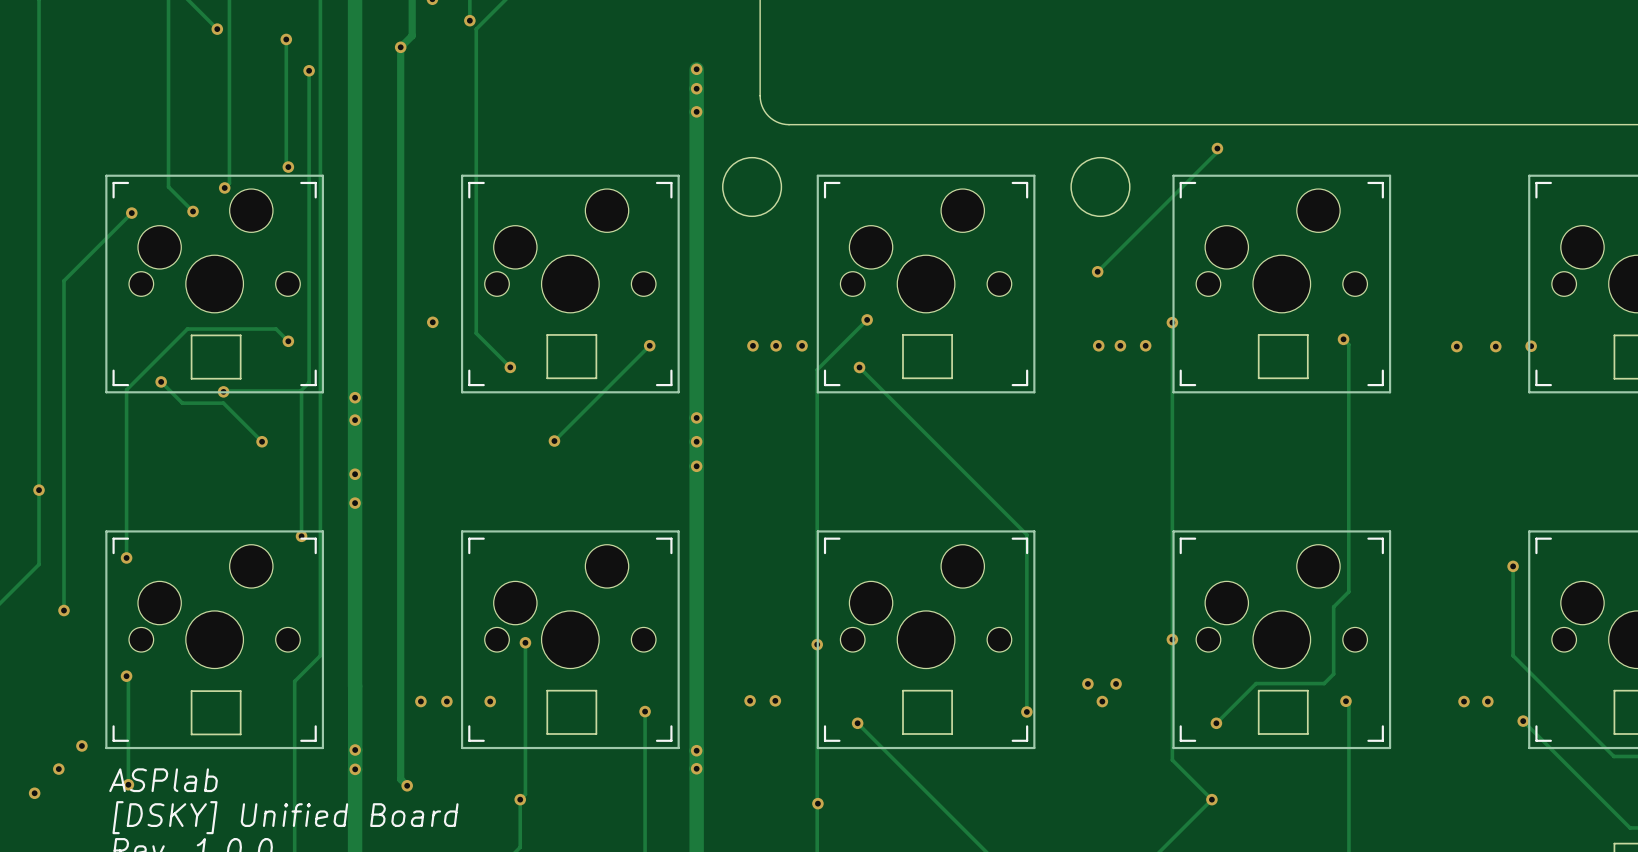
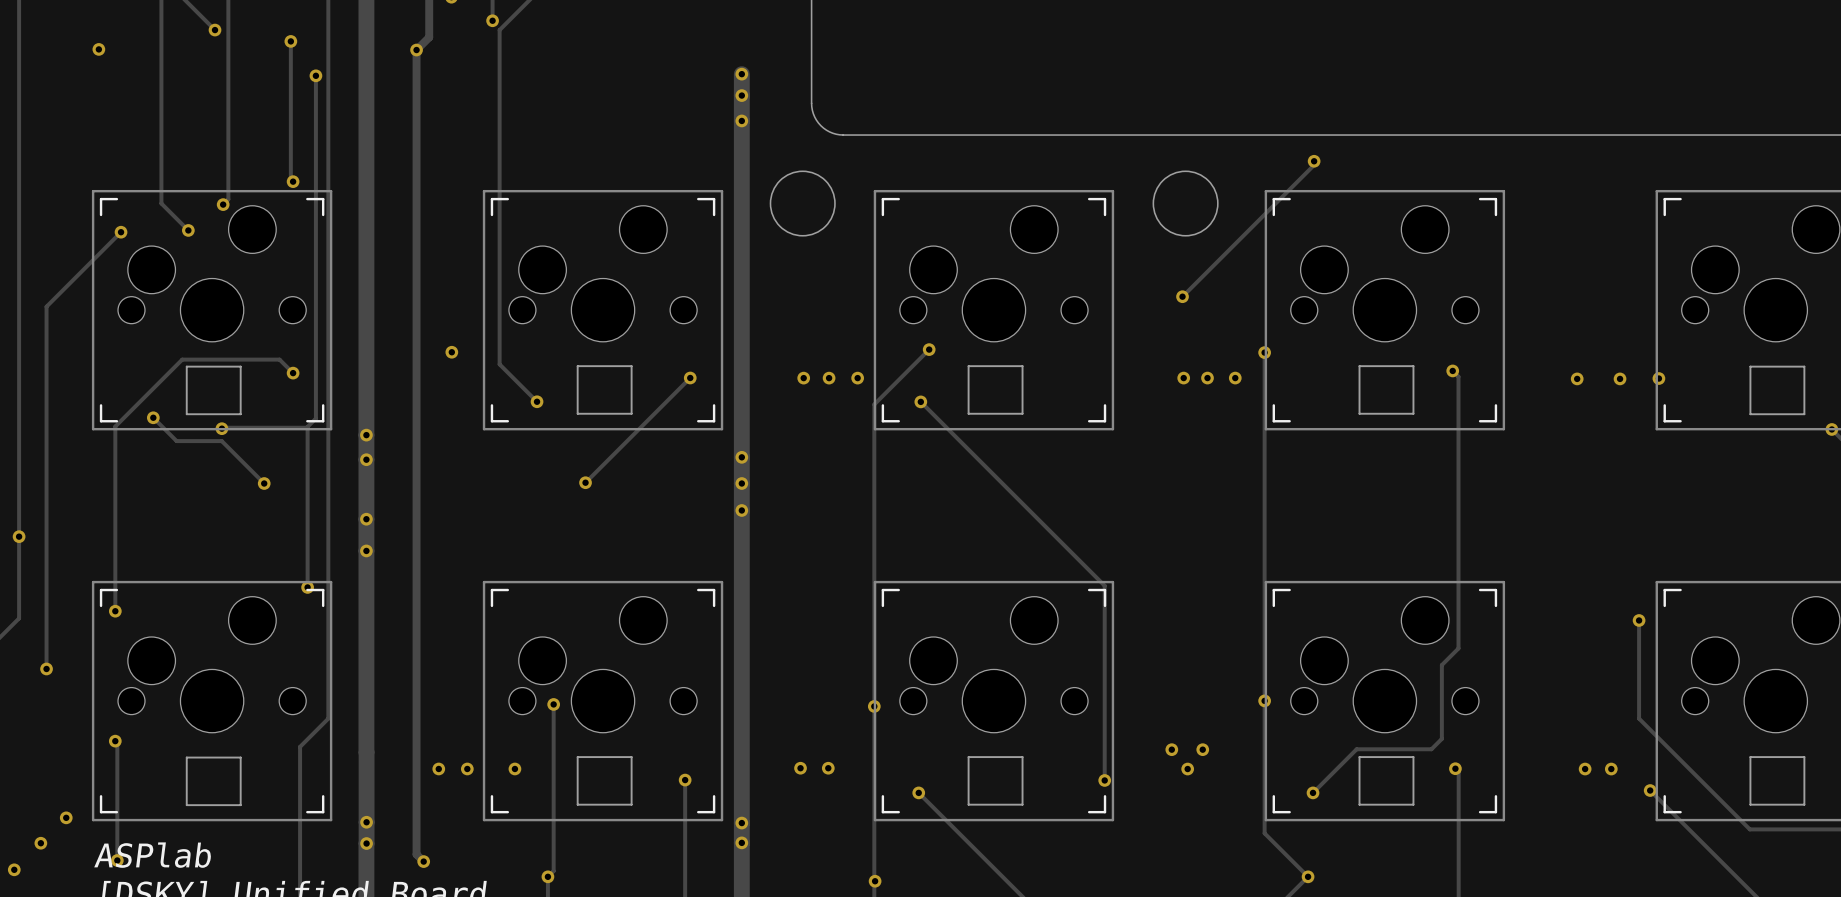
via: none -> (98, 49)

